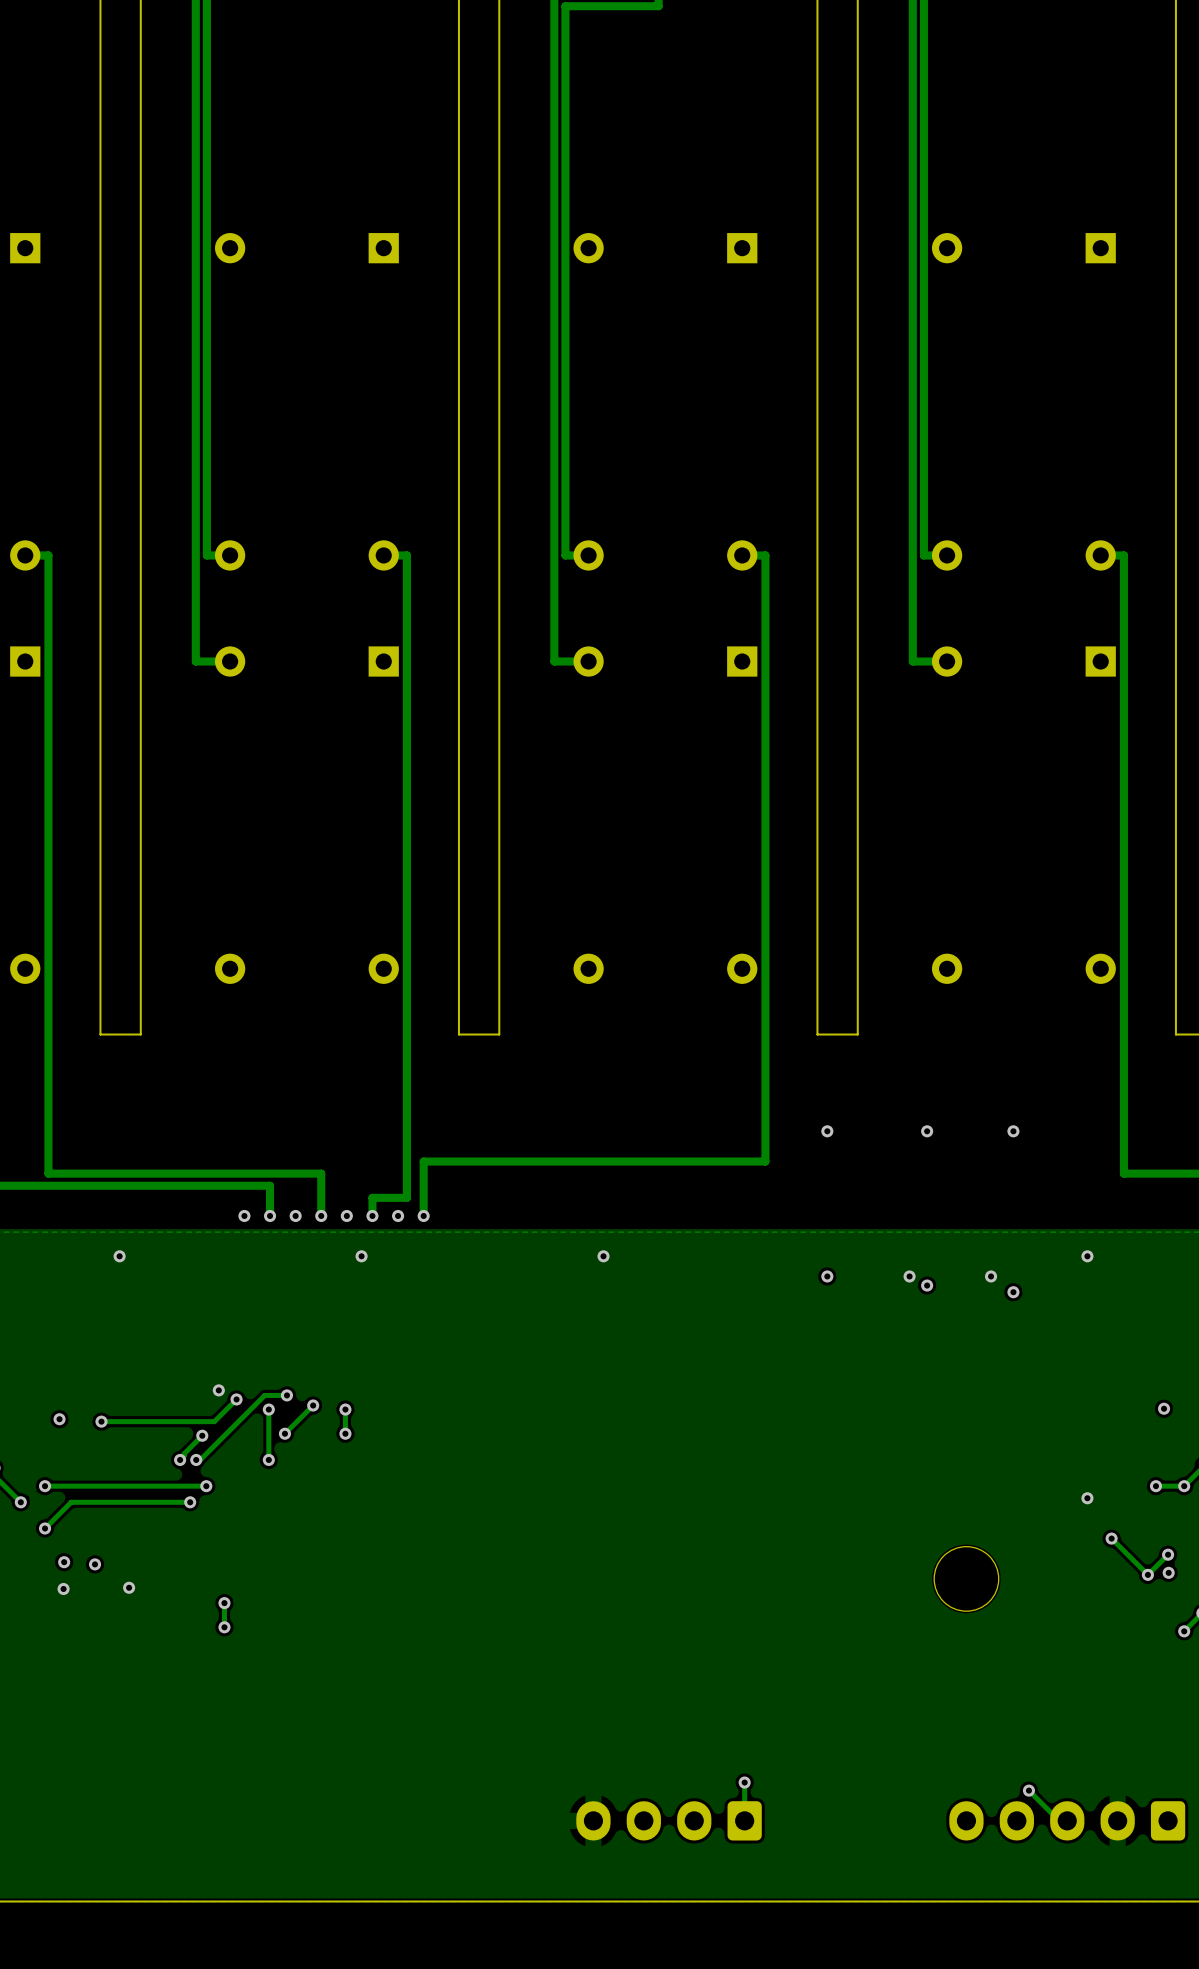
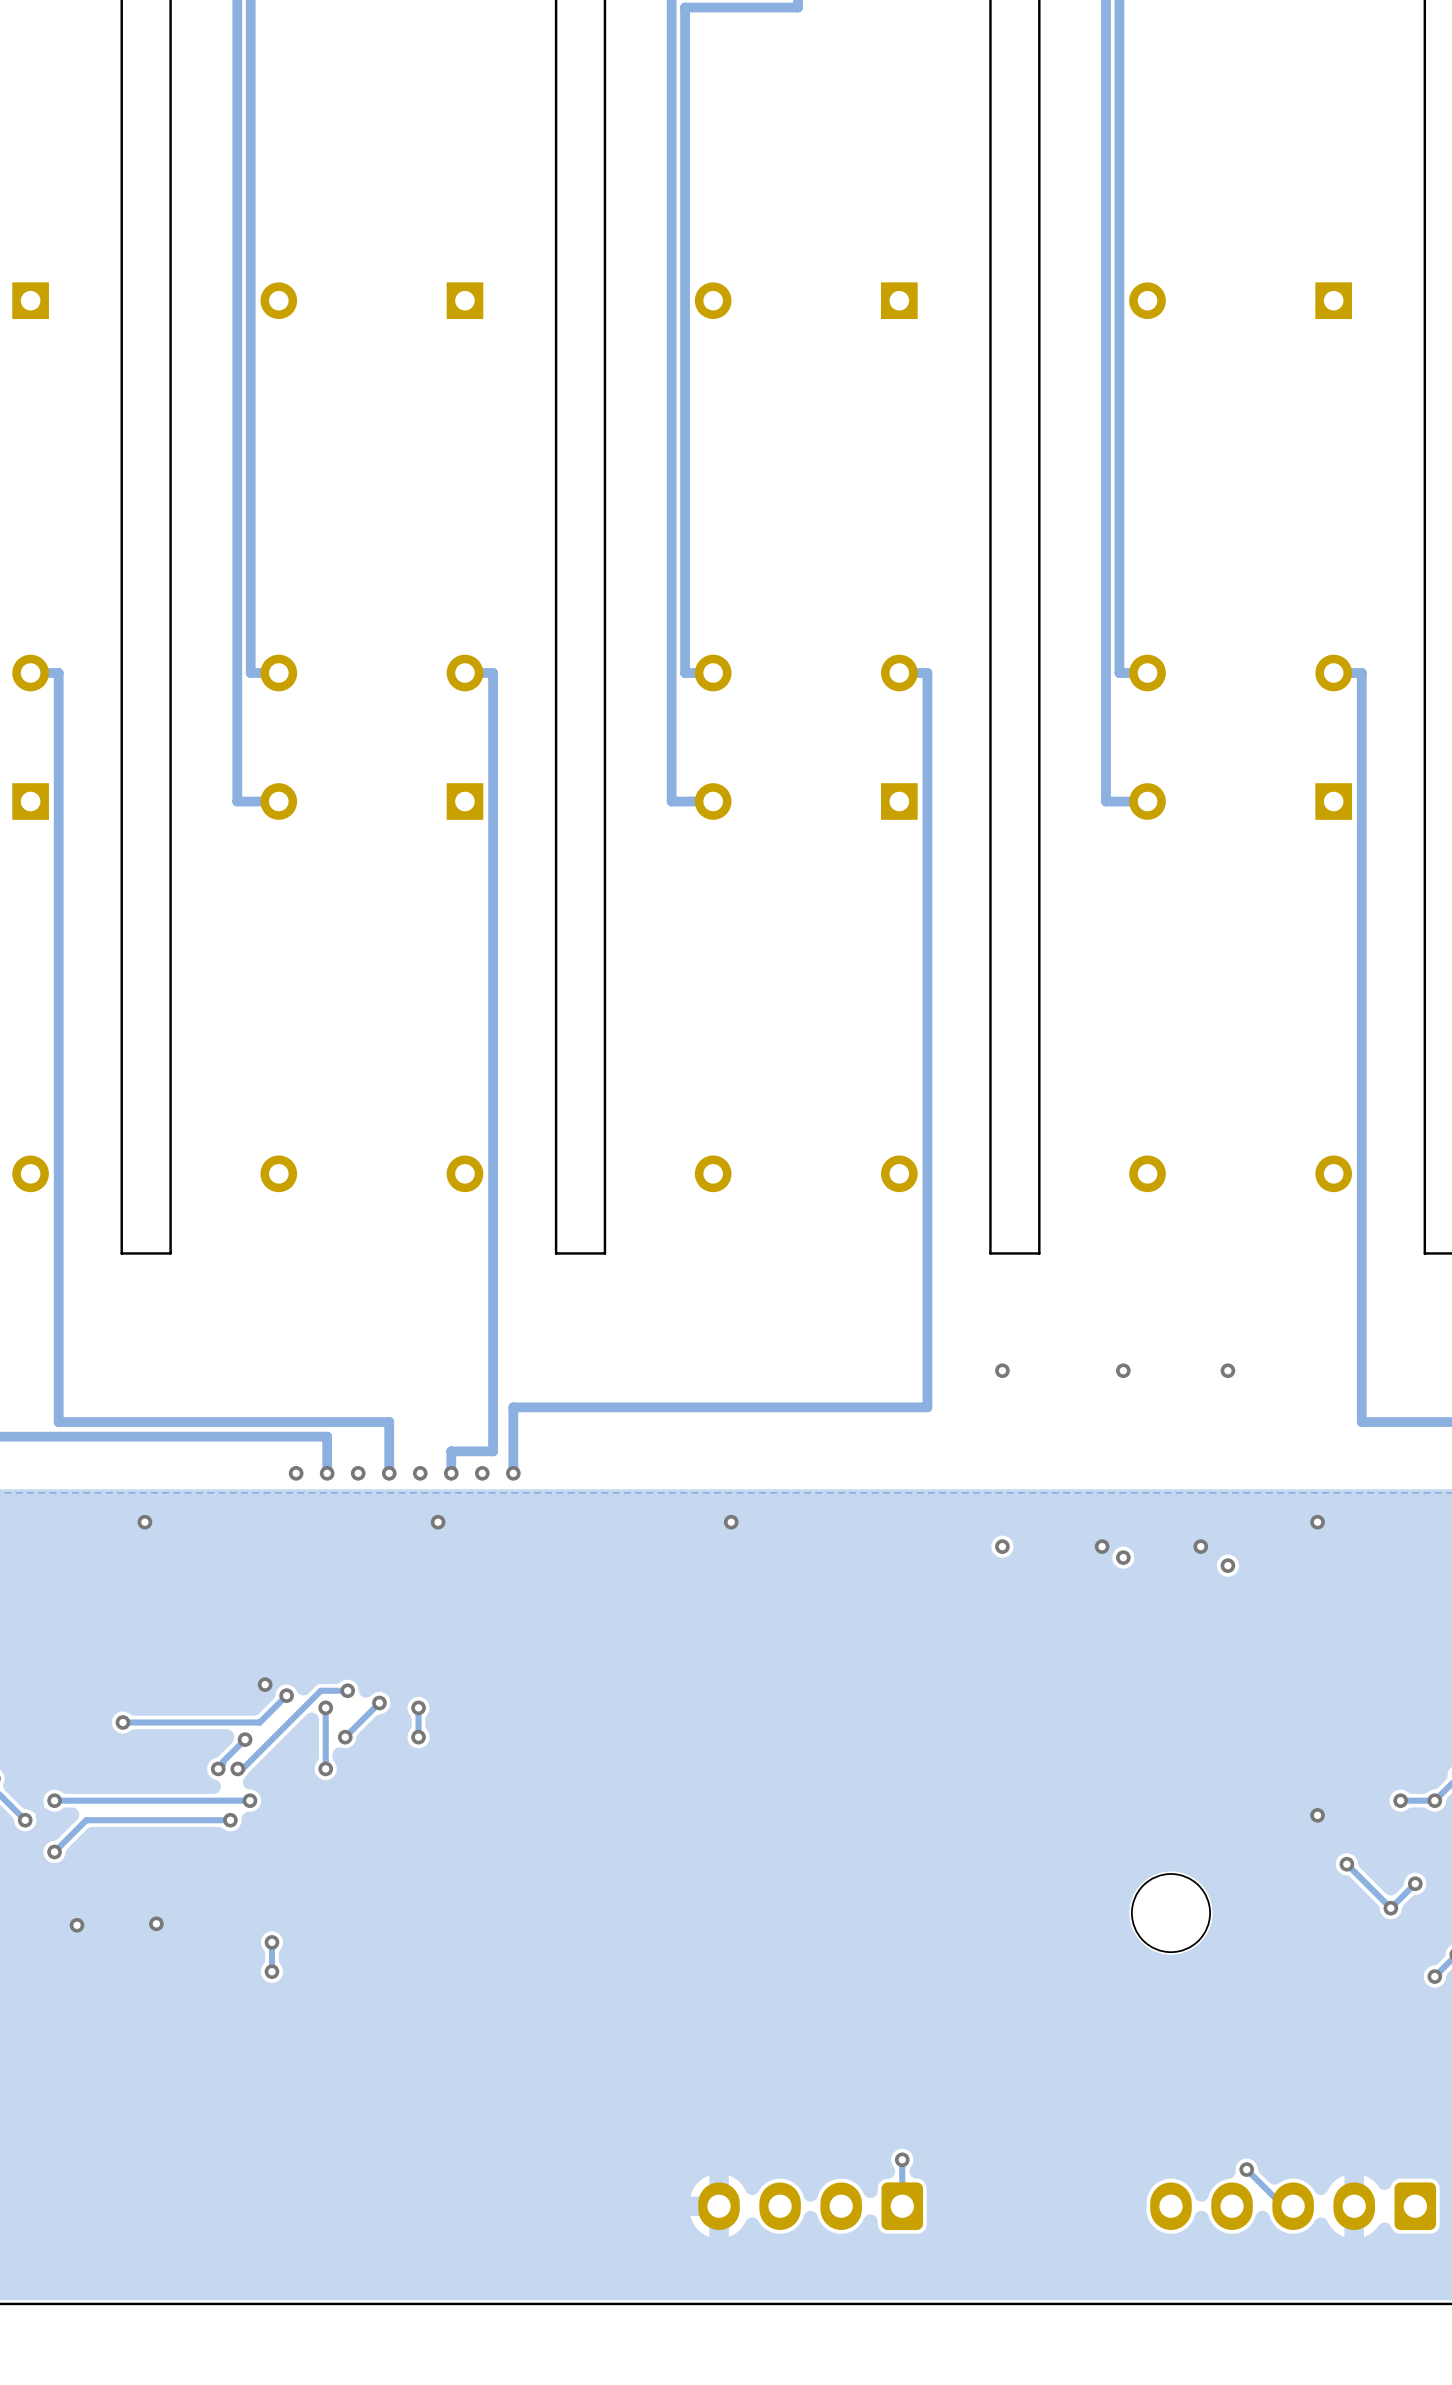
via: (1164, 1408) -> none
via: (59, 1419) -> none
via: (64, 1562) -> none
via: (95, 1564) -> none
via: (1168, 1572) -> none

